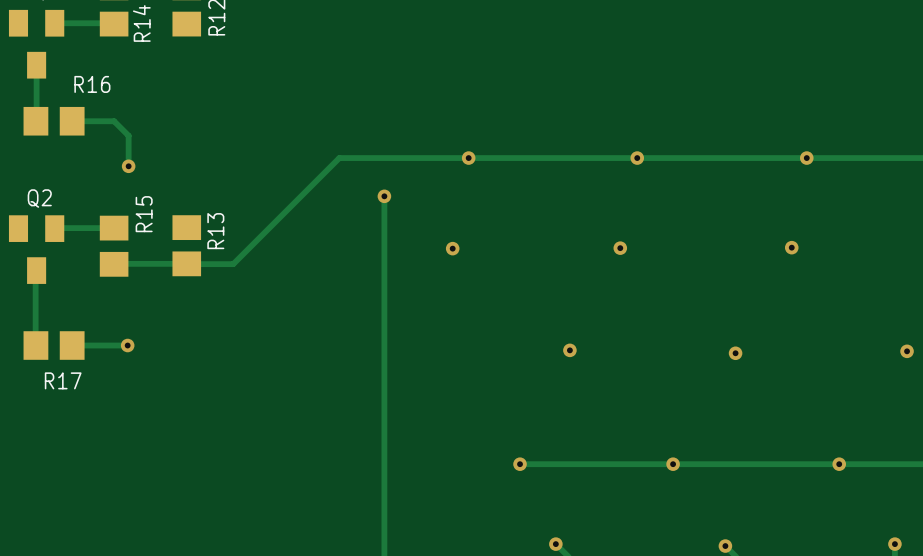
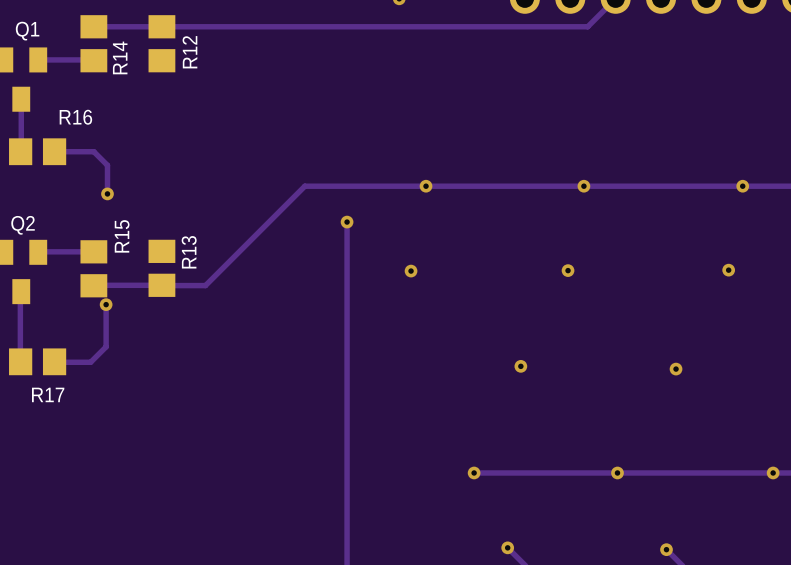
track: (127, 345) (72, 345) -> (106, 304) (106, 346) (90, 362) (54, 361)
via position: (127, 345) -> (106, 304)

